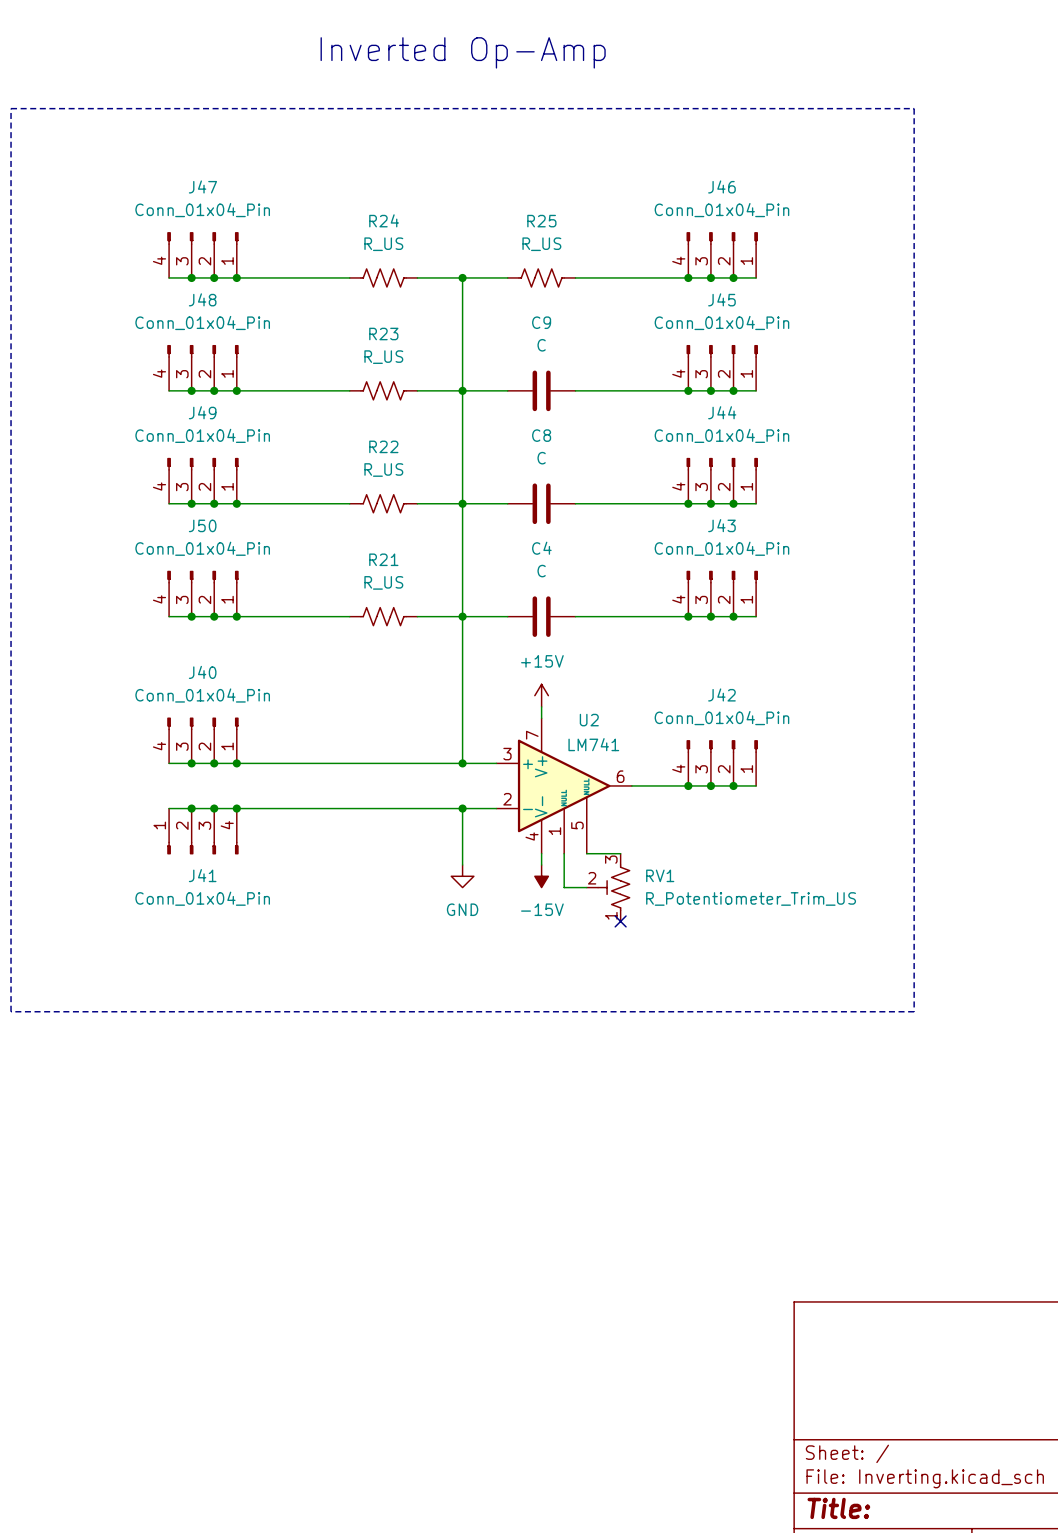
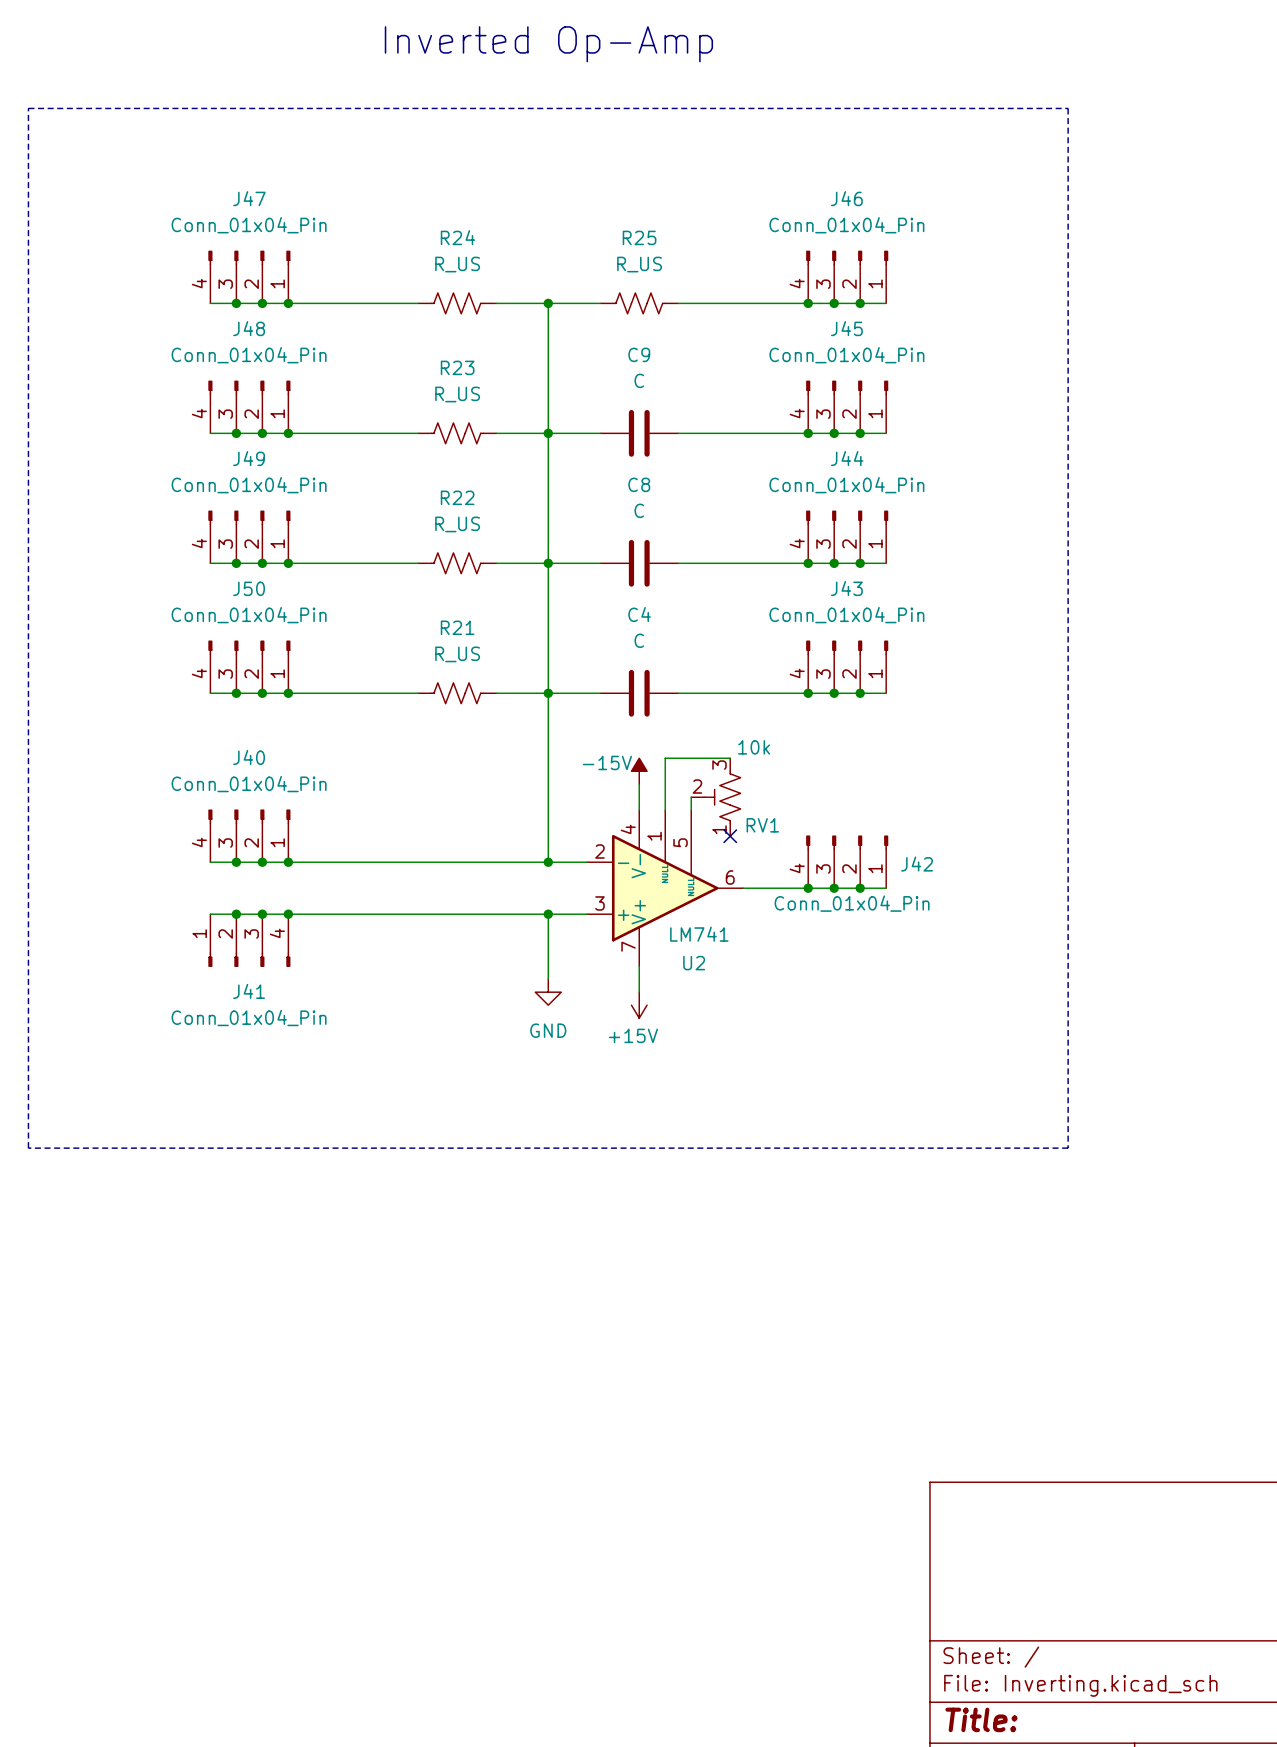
wire: none -> (730, 758) (665, 758) (665, 810)
J42 name position: J42 (721, 694) -> J42 (917, 864)
power symbol rotation: 0° (541, 695) -> 180° (639, 1005)
power symbol position: +15V (541, 695) -> +15V (639, 1005)
wire: none -> (691, 797) (691, 810)
J42 value position: Conn_01x04_Pin (721, 718) -> Conn_01x04_Pin (852, 903)
no-connect mark: none -> (730, 836)
U2 flip: as is (564, 785) -> up-down (665, 888)
wire: (564, 853) (564, 887) (586, 887) -> none
wire: (586, 853) (620, 853) -> none
RV1 name position: RV1 (660, 875) -> RV1 (762, 825)
power symbol rotation: 0° (541, 876) -> 180° (639, 771)
power symbol position: -15V (541, 876) -> -15V (639, 771)
RV1 position: (608, 887) -> (715, 797)
RV1 value: R_Potentiometer_Trim_US (751, 898) -> 10k (754, 747)
power symbol text position: -15V (542, 909) -> -15V (607, 762)
no-connect mark: (620, 921) -> none

